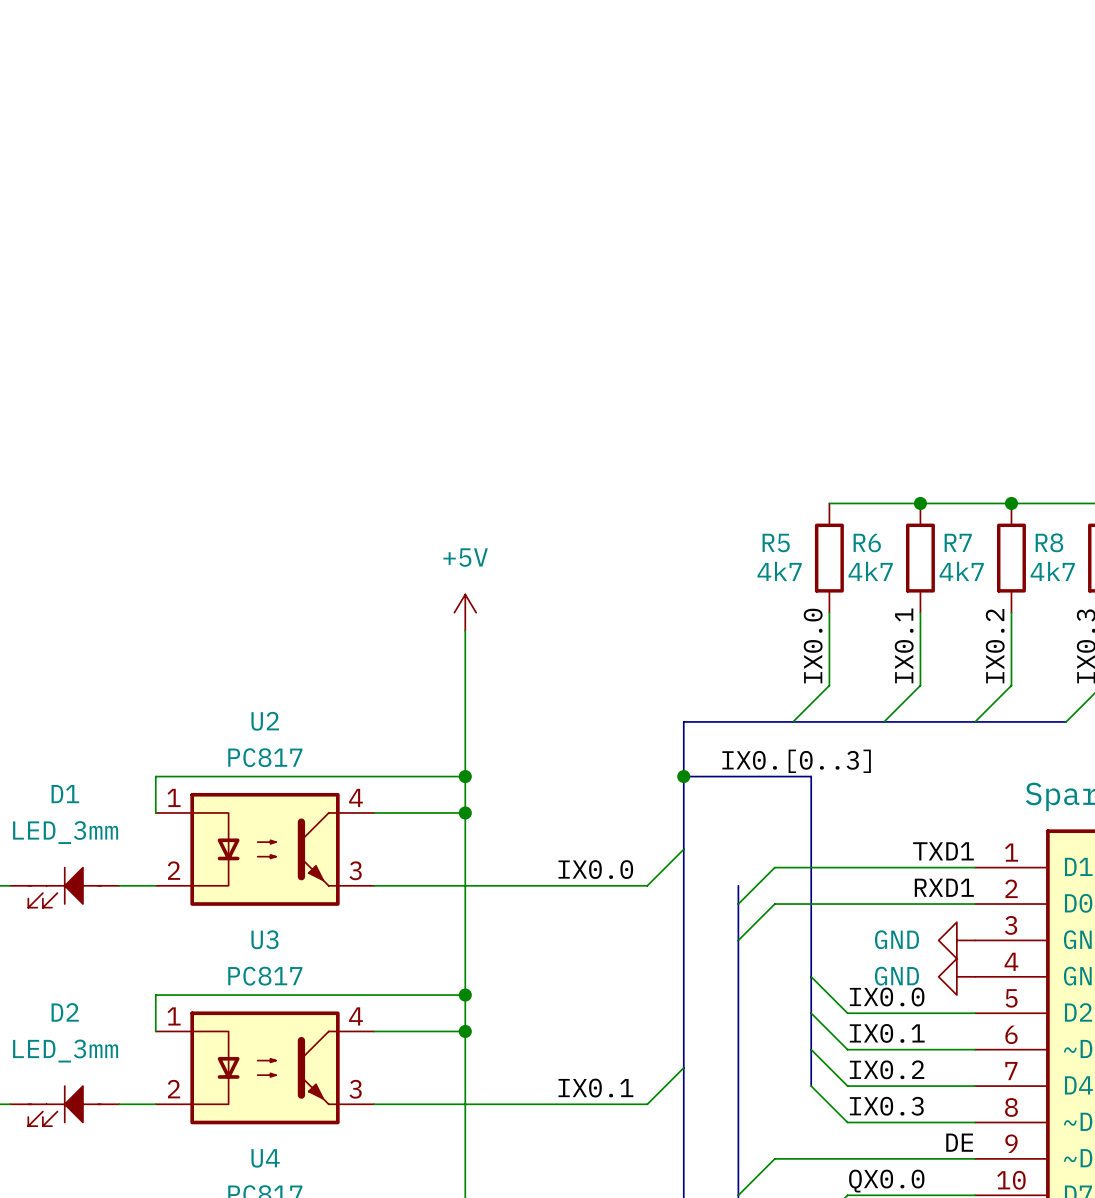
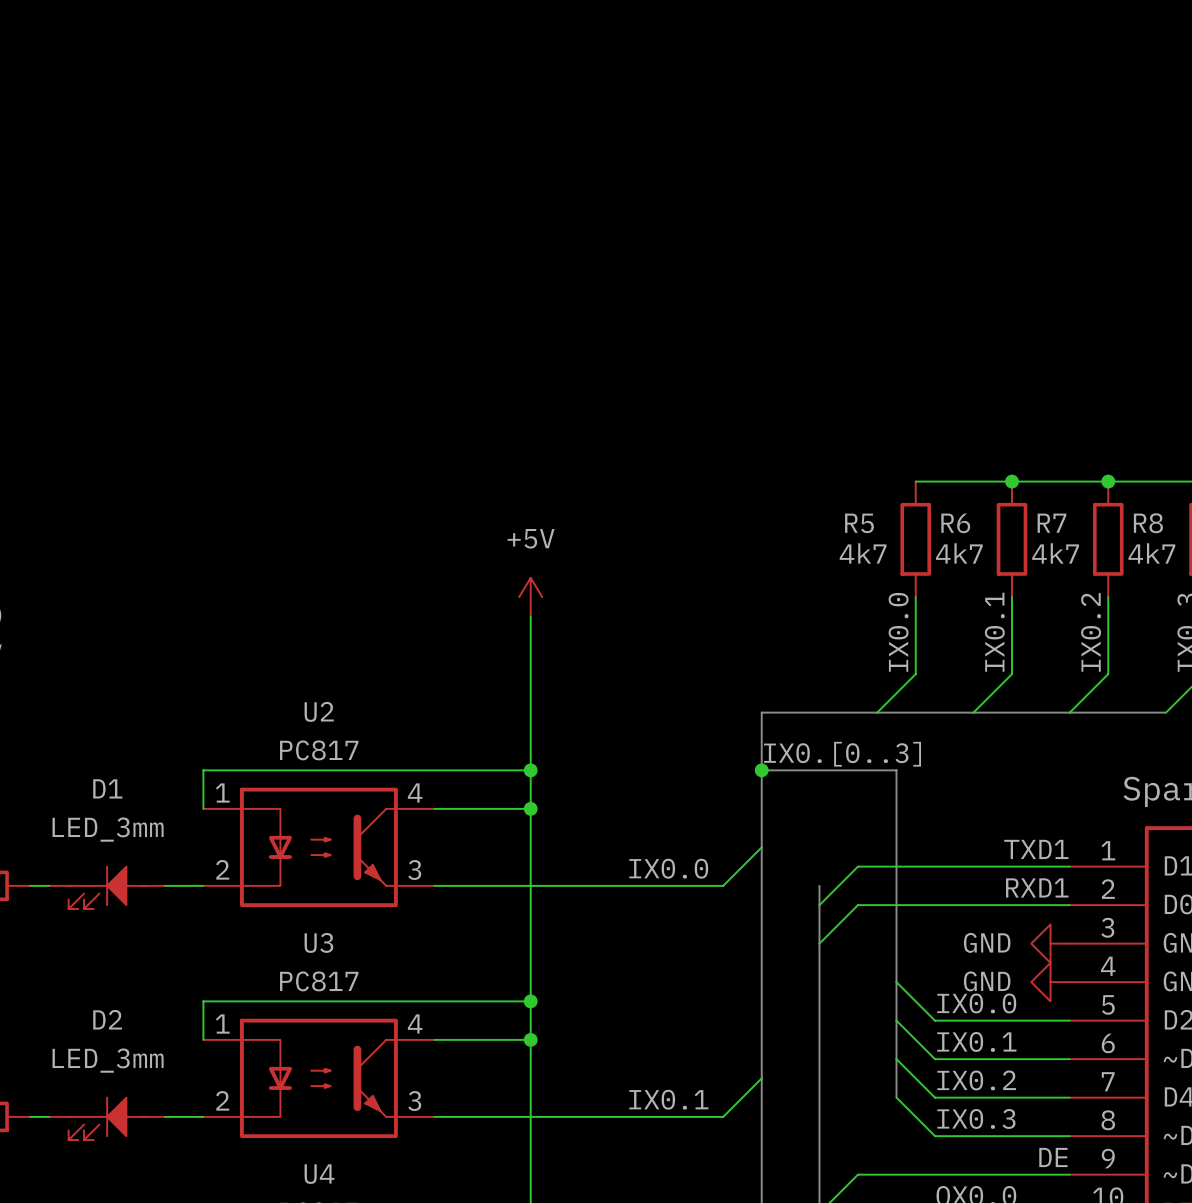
label position: IX0.[0..3] (796, 761) -> IX0.[0..3] (842, 754)

